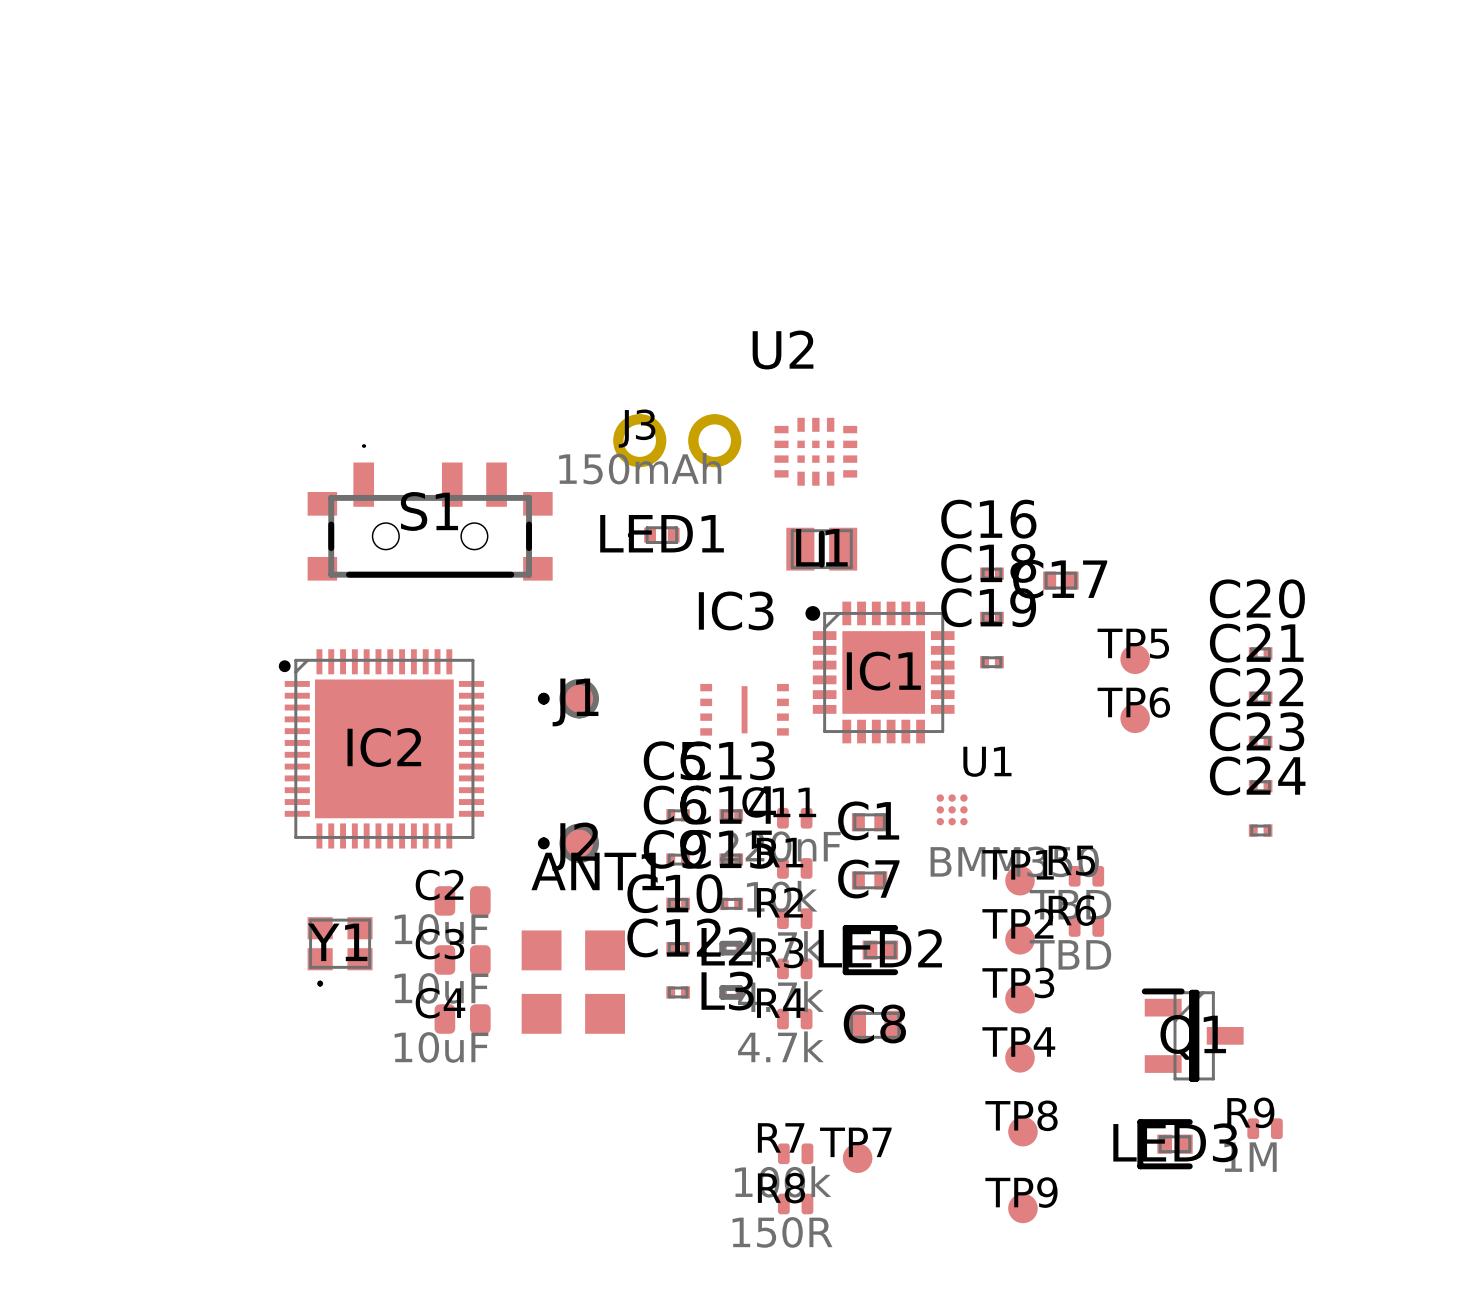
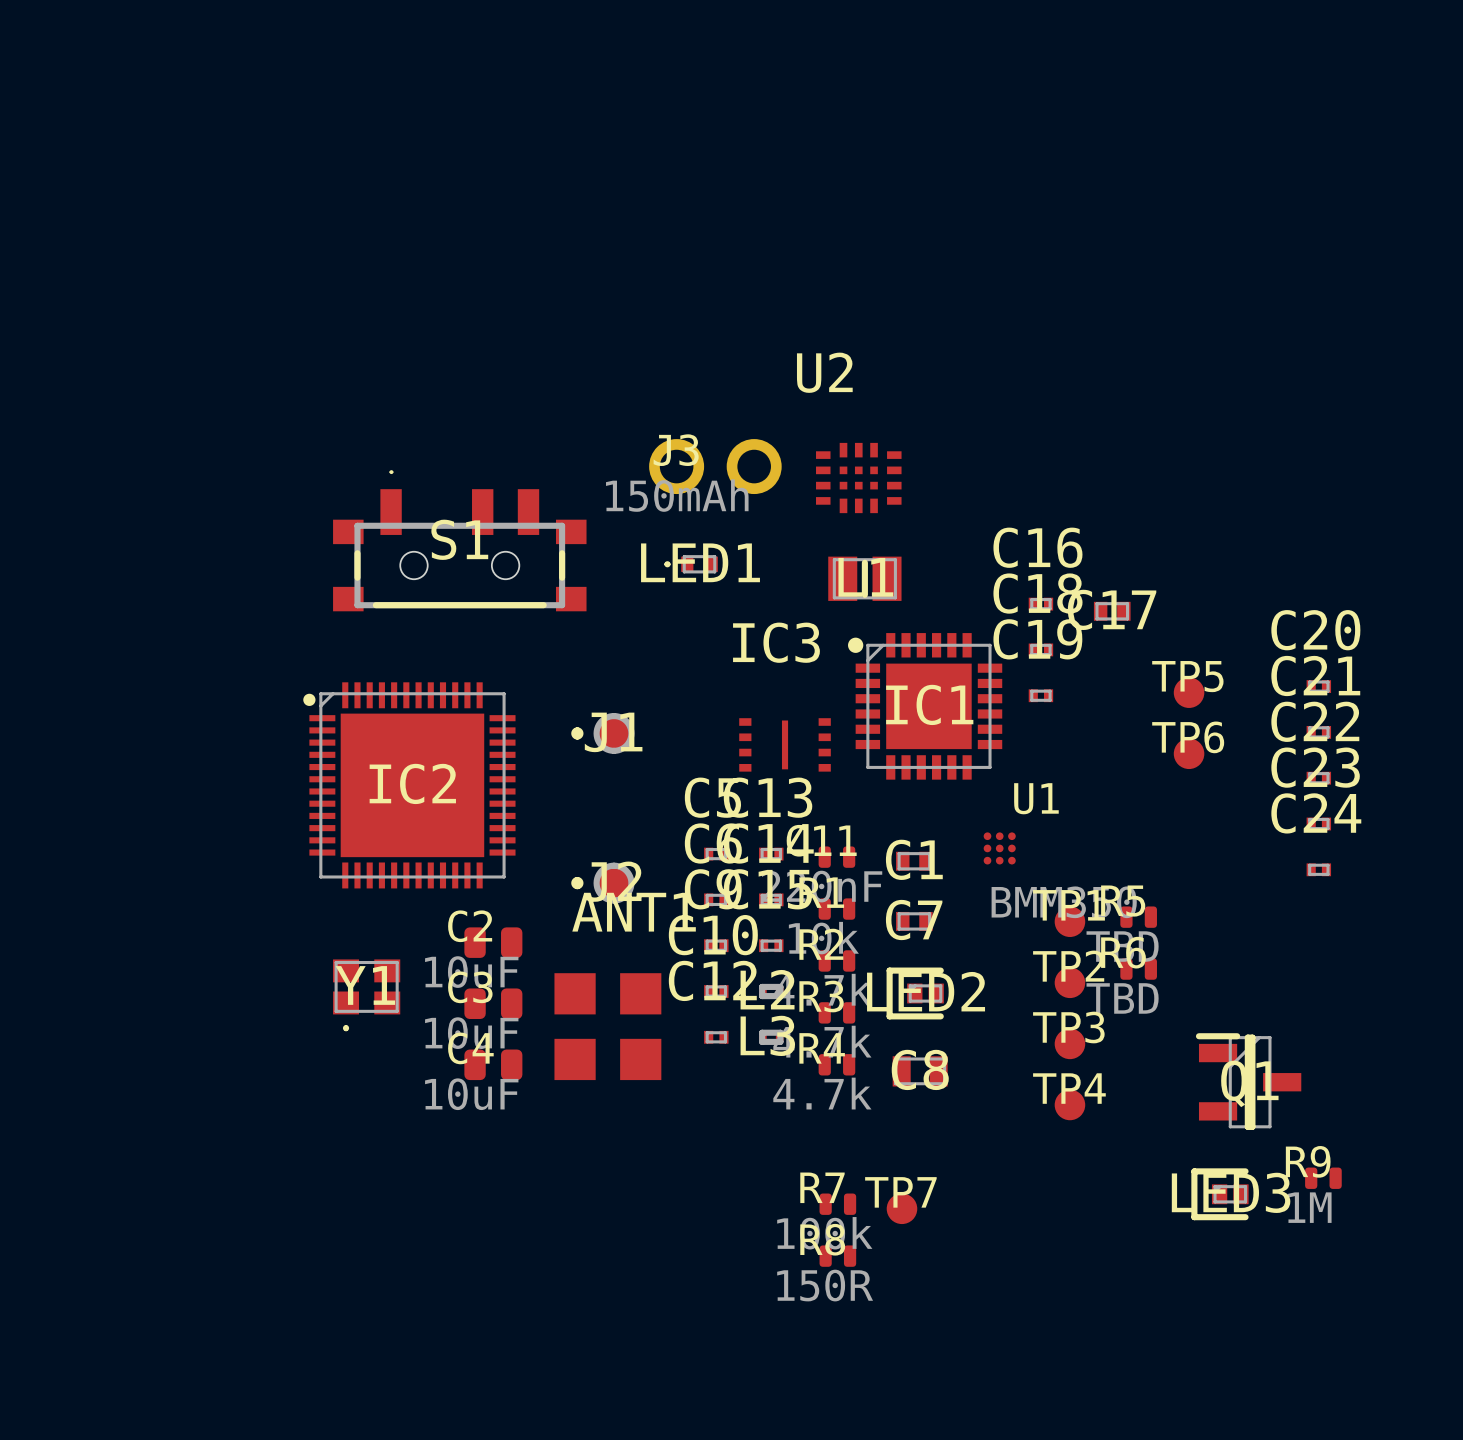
TP8: (1022, 1131) -> none
TP9: (1022, 1208) -> none

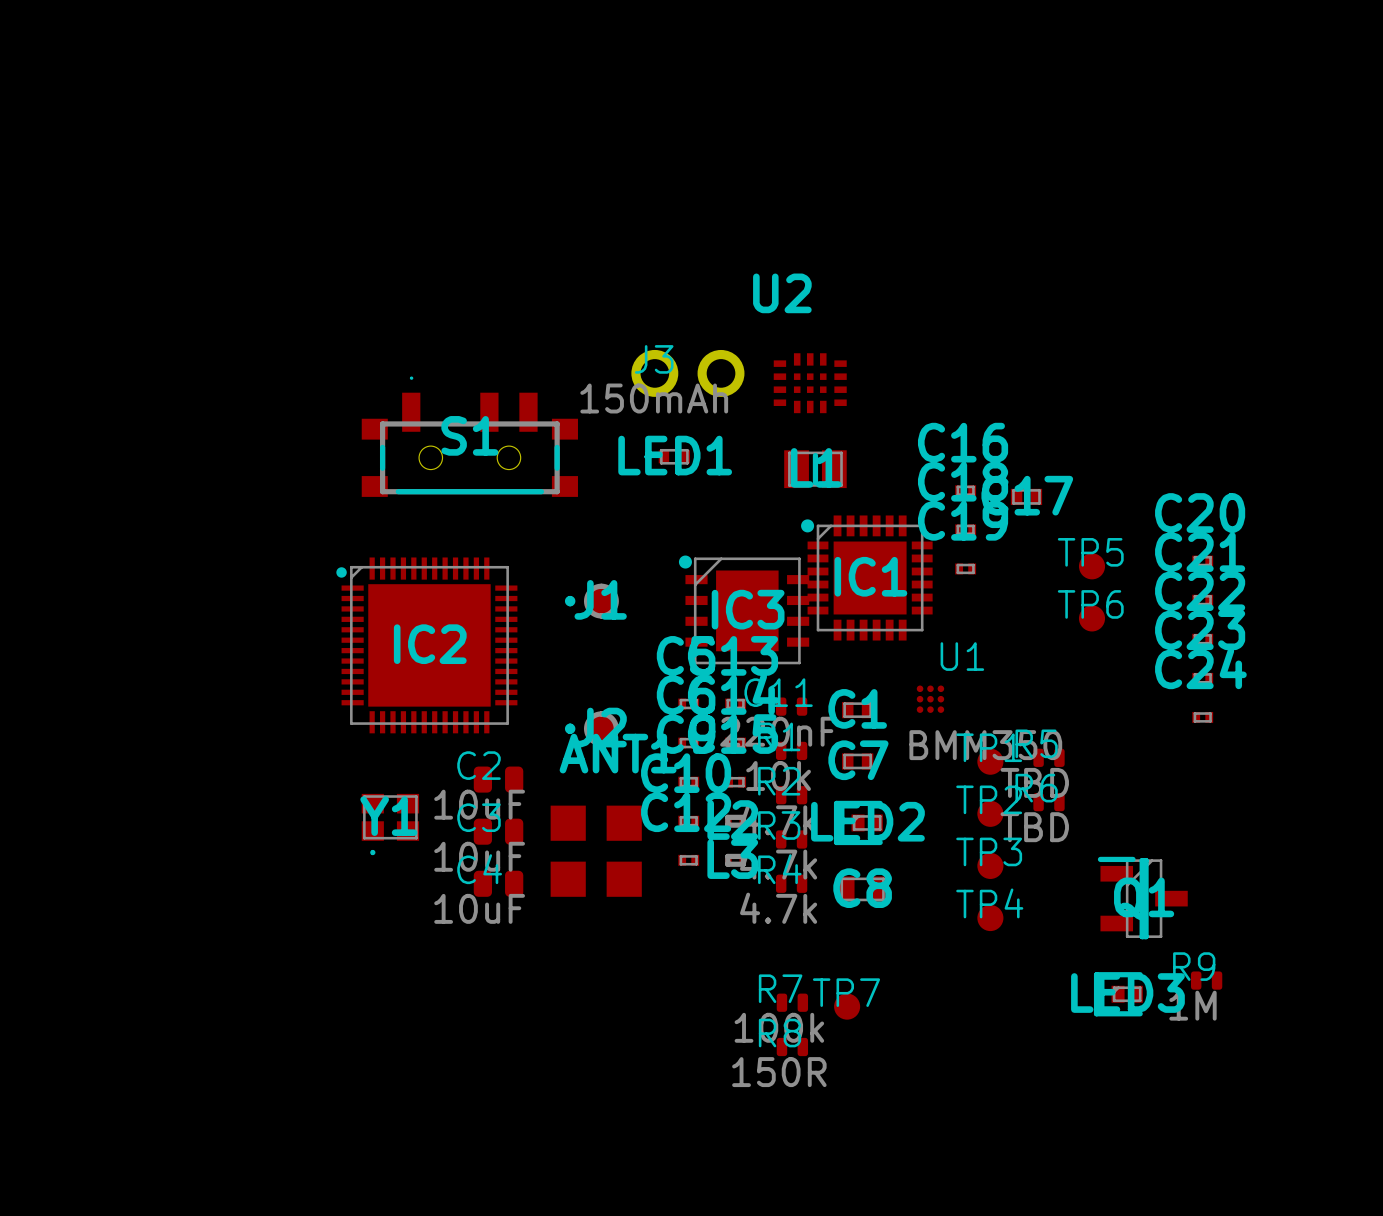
IC3 name position: IC3 (776, 642) -> IC3 (748, 609)
IC3 footprint: [739, 718, 831, 772] -> [678, 555, 810, 665]

